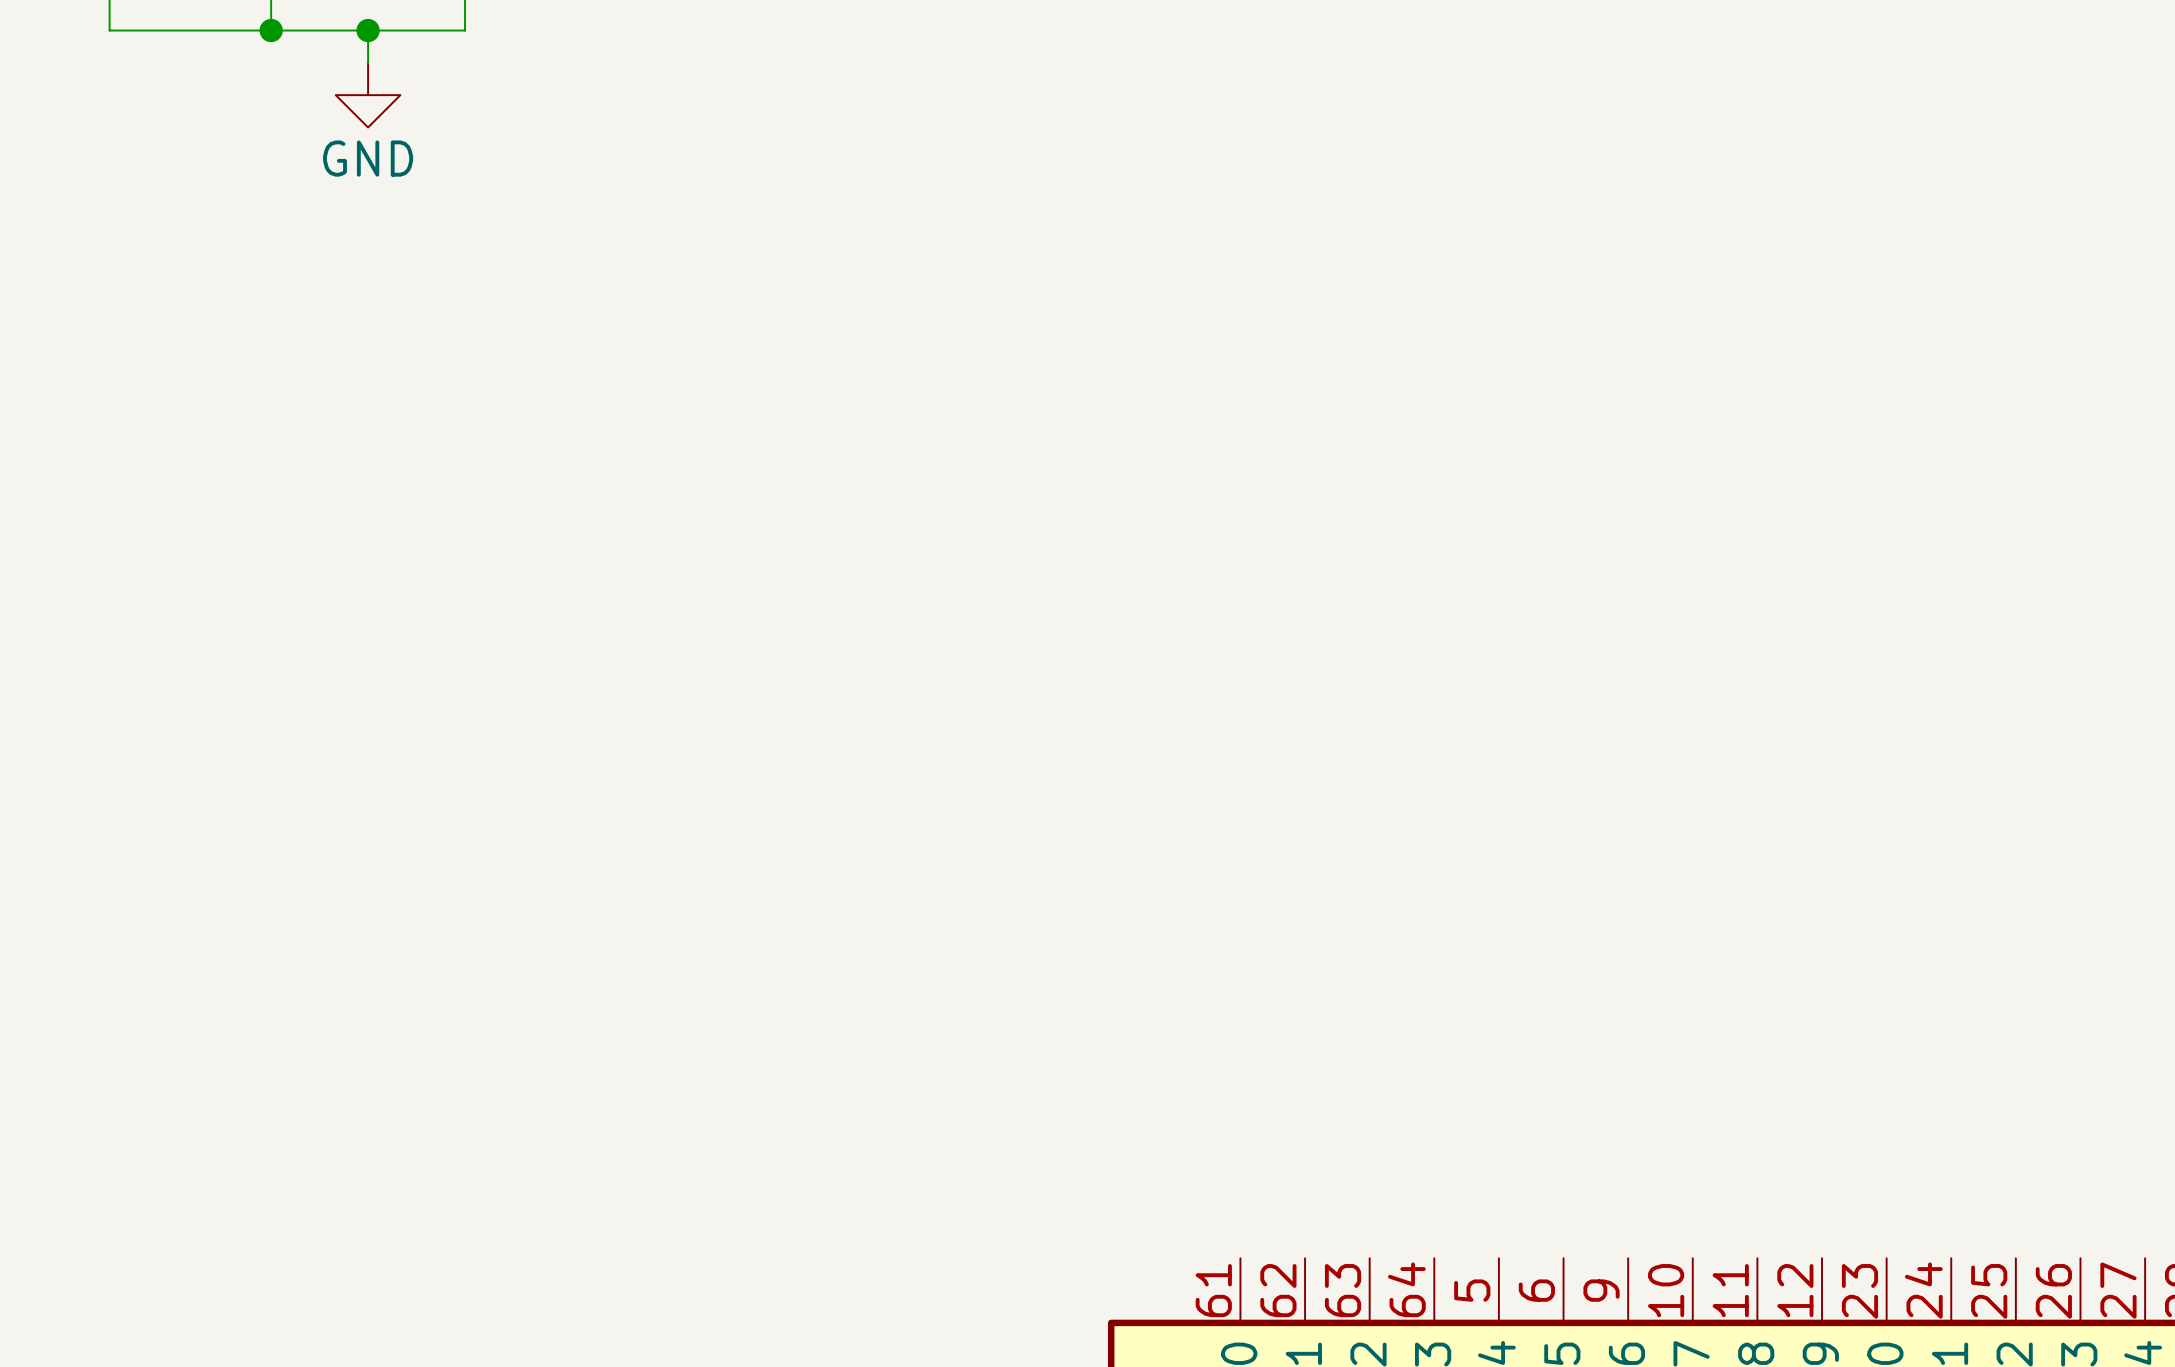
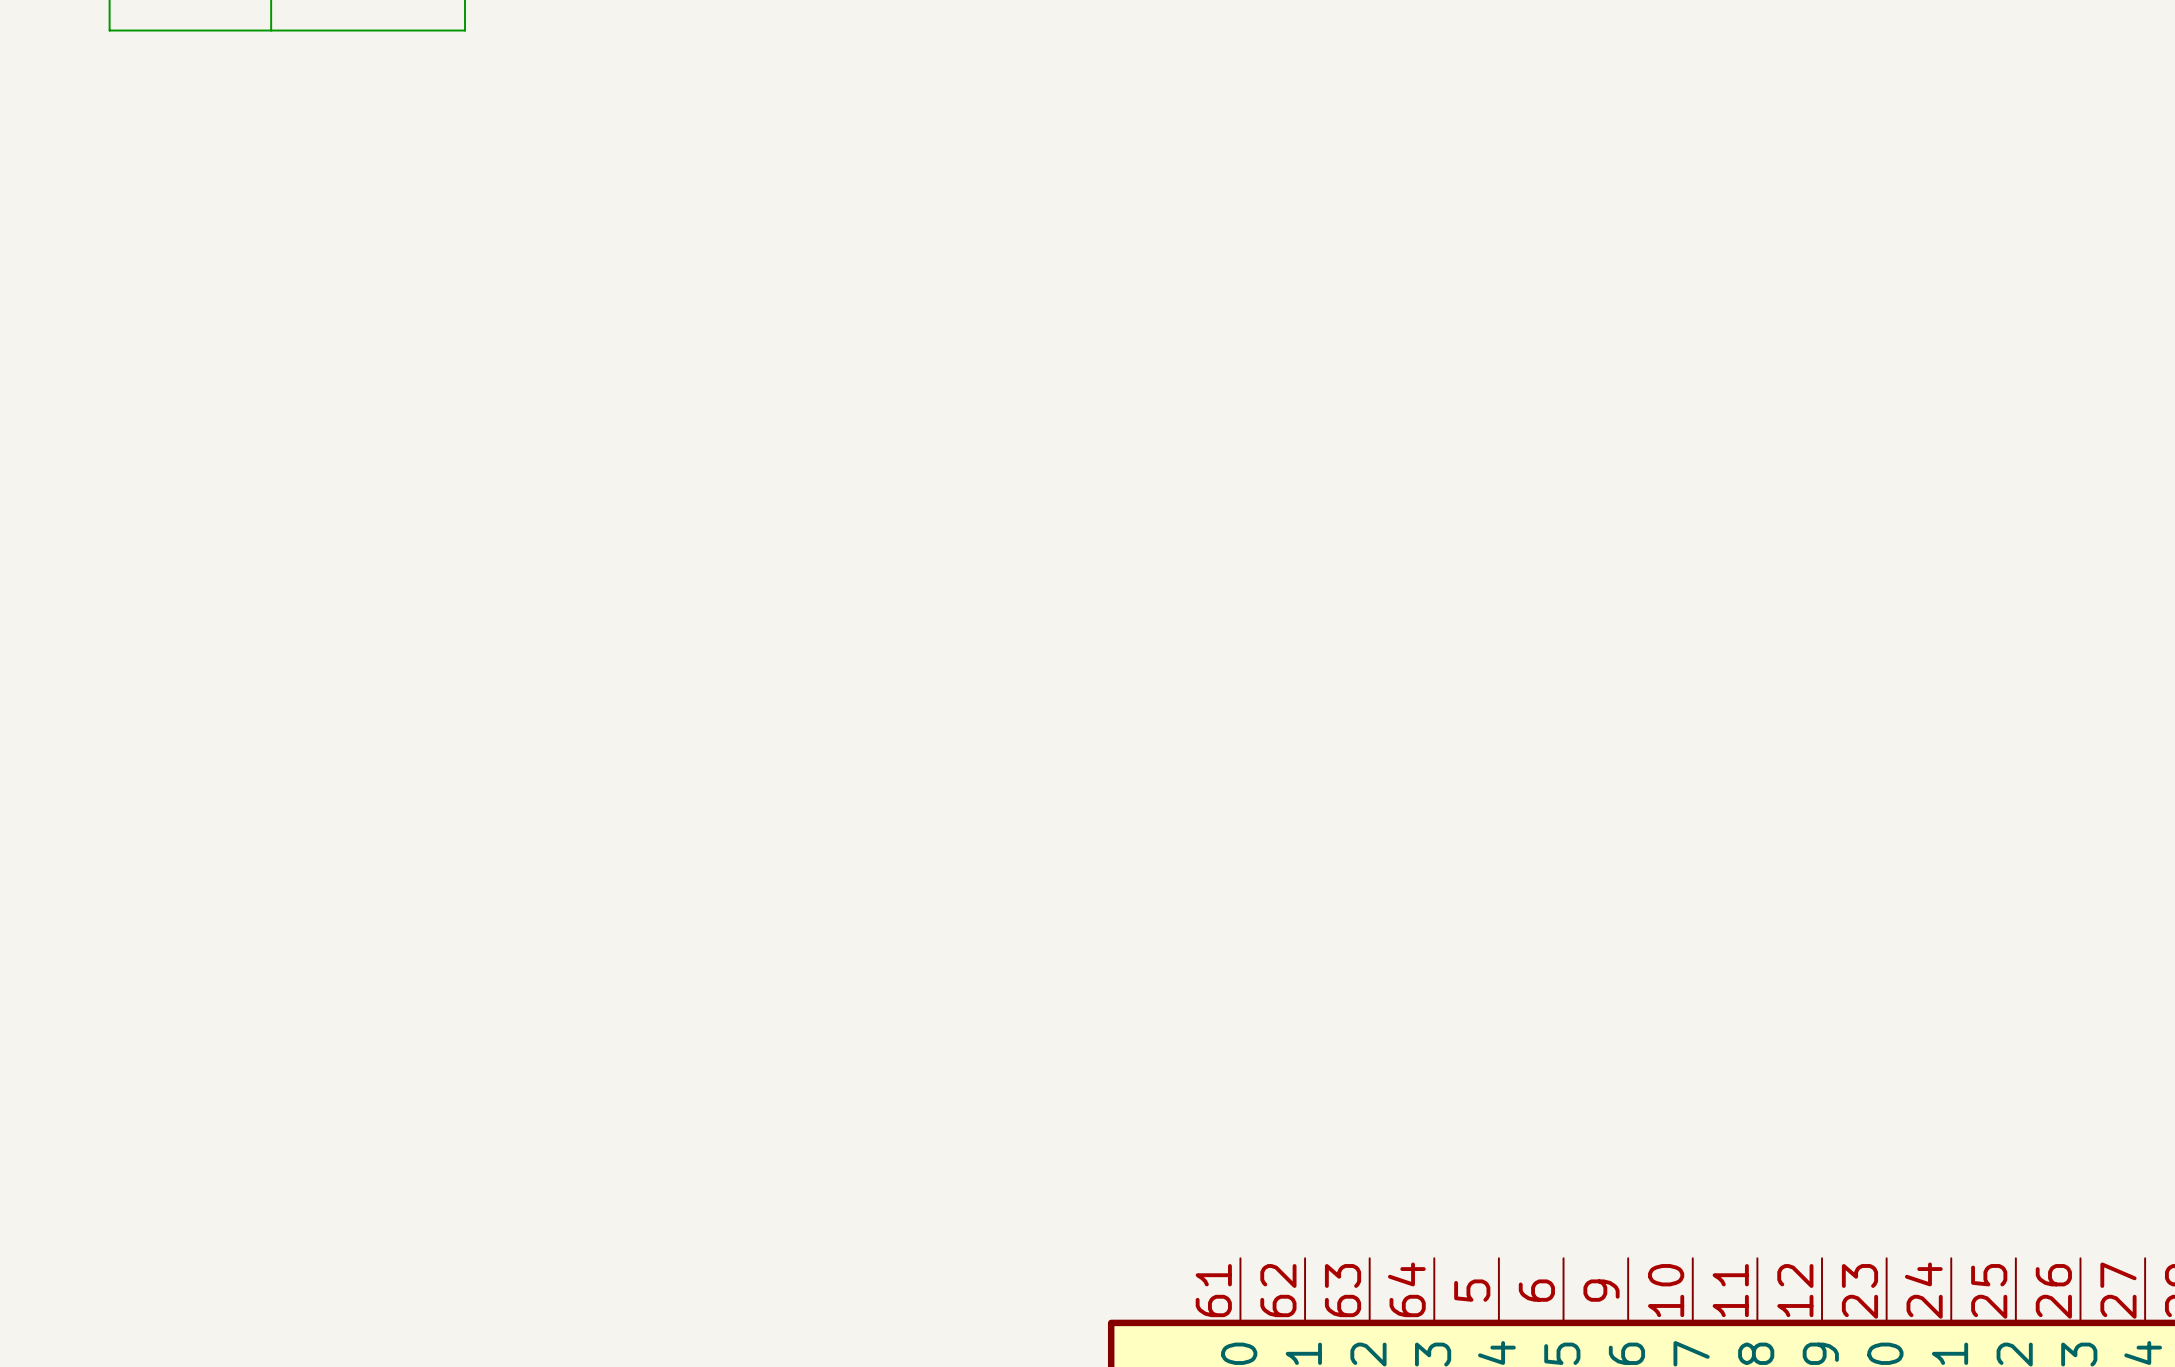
junction: (271, 30) -> none
wire: (368, 30) (368, 62) -> none
junction: (368, 30) -> none
power symbol: GND (368, 95) -> none

